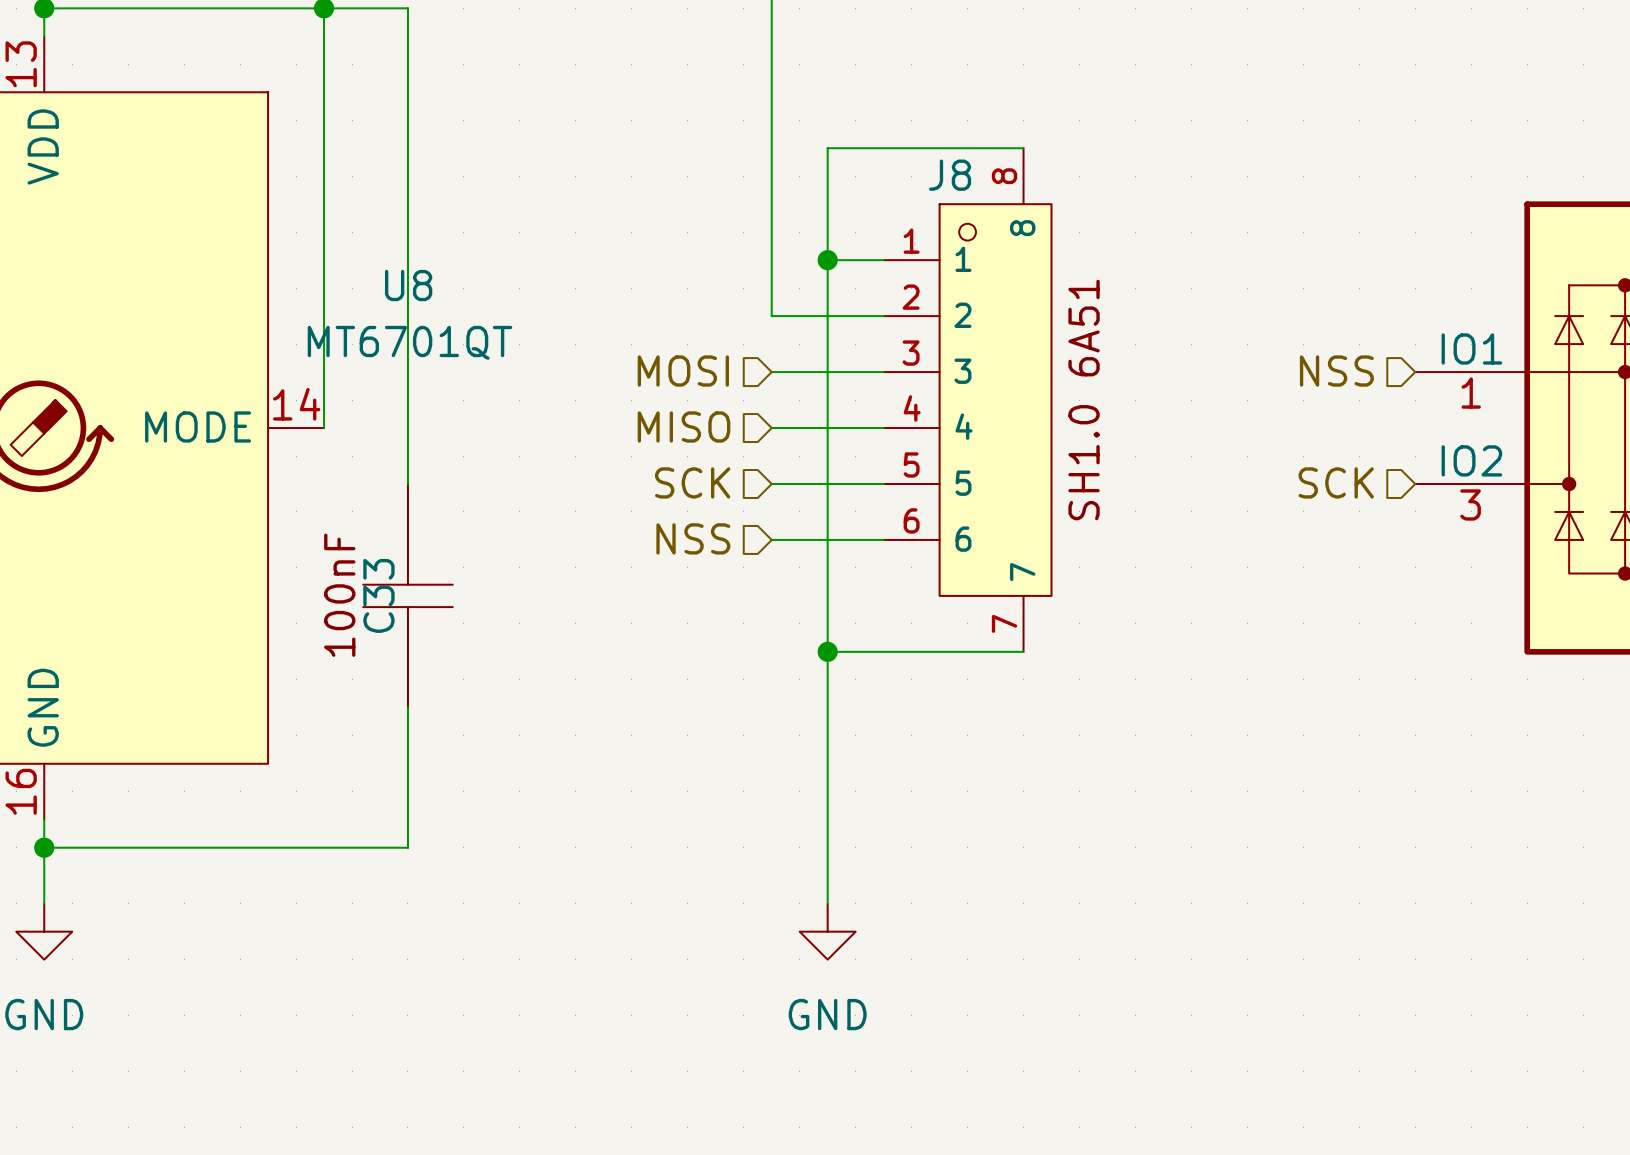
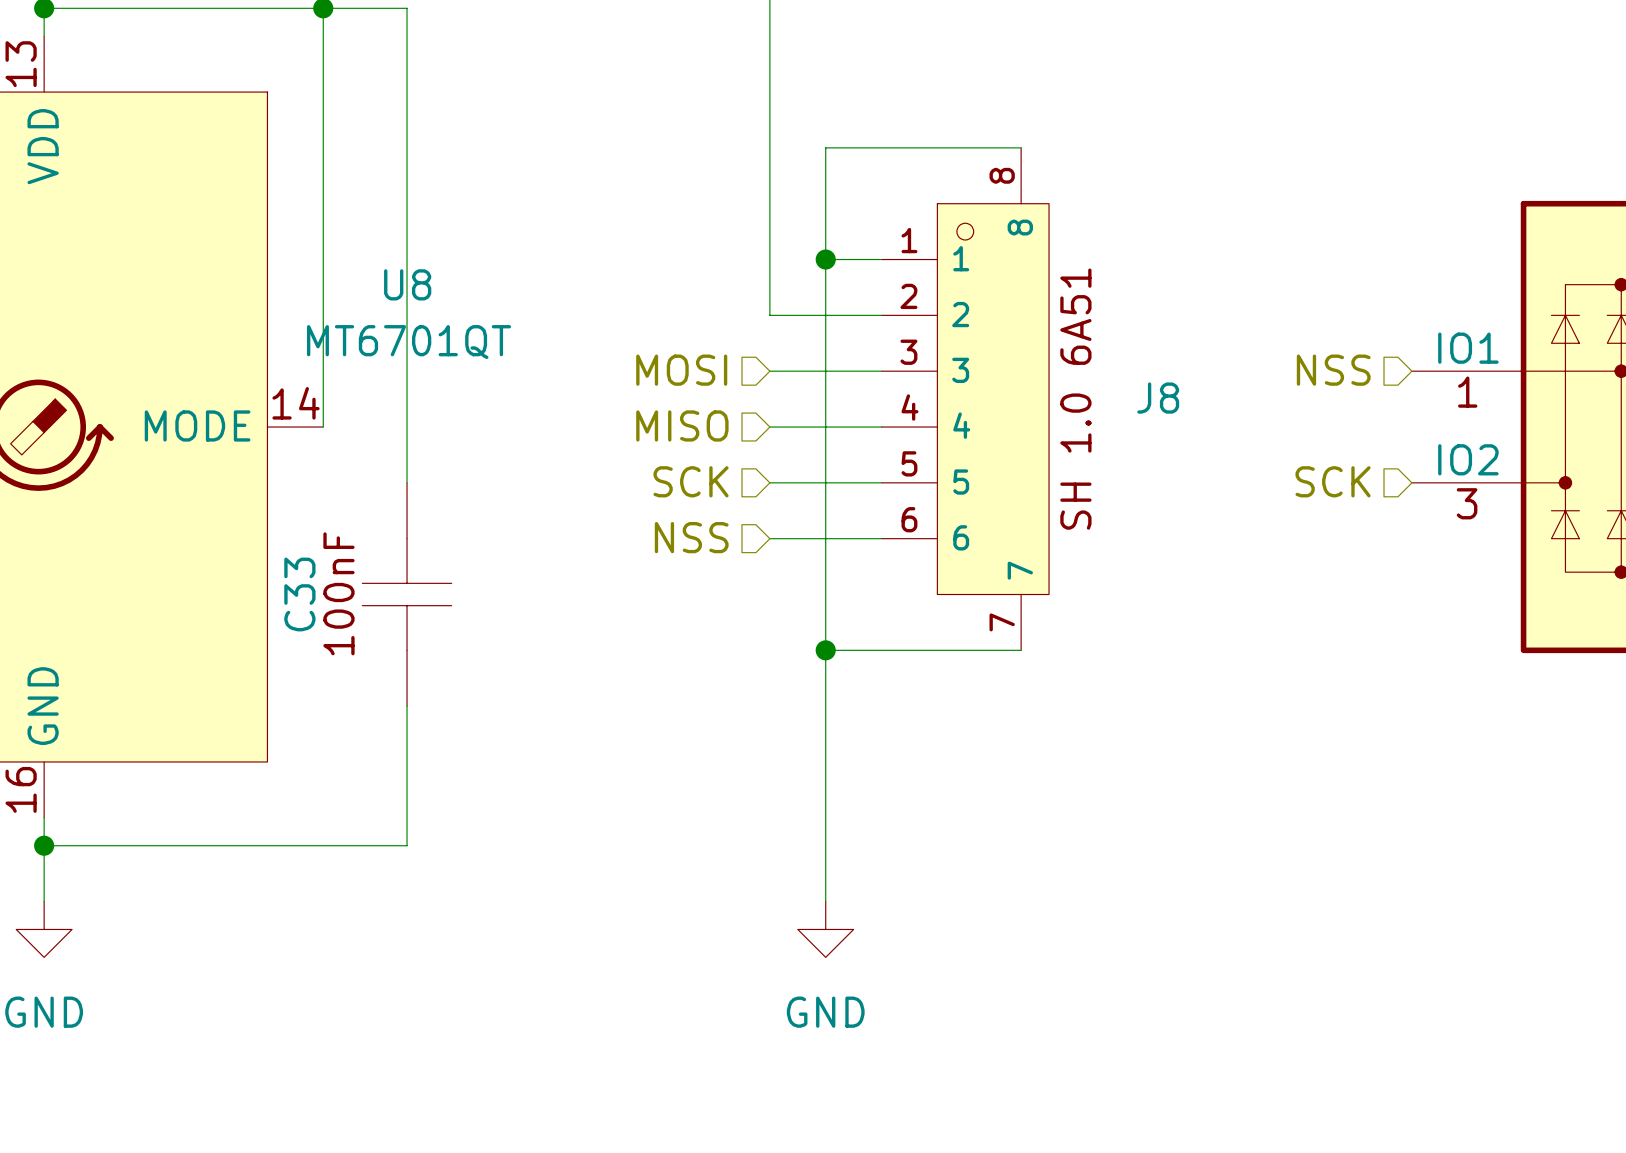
J8 name position: J8 (950, 175) -> J8 (1158, 398)
J8 text: none -> SH 1.0 6A51 (1075, 399)
J8 text: SH1.0 6A51 (1084, 400) -> none
C33 name position: C33 (378, 595) -> C33 (299, 594)

